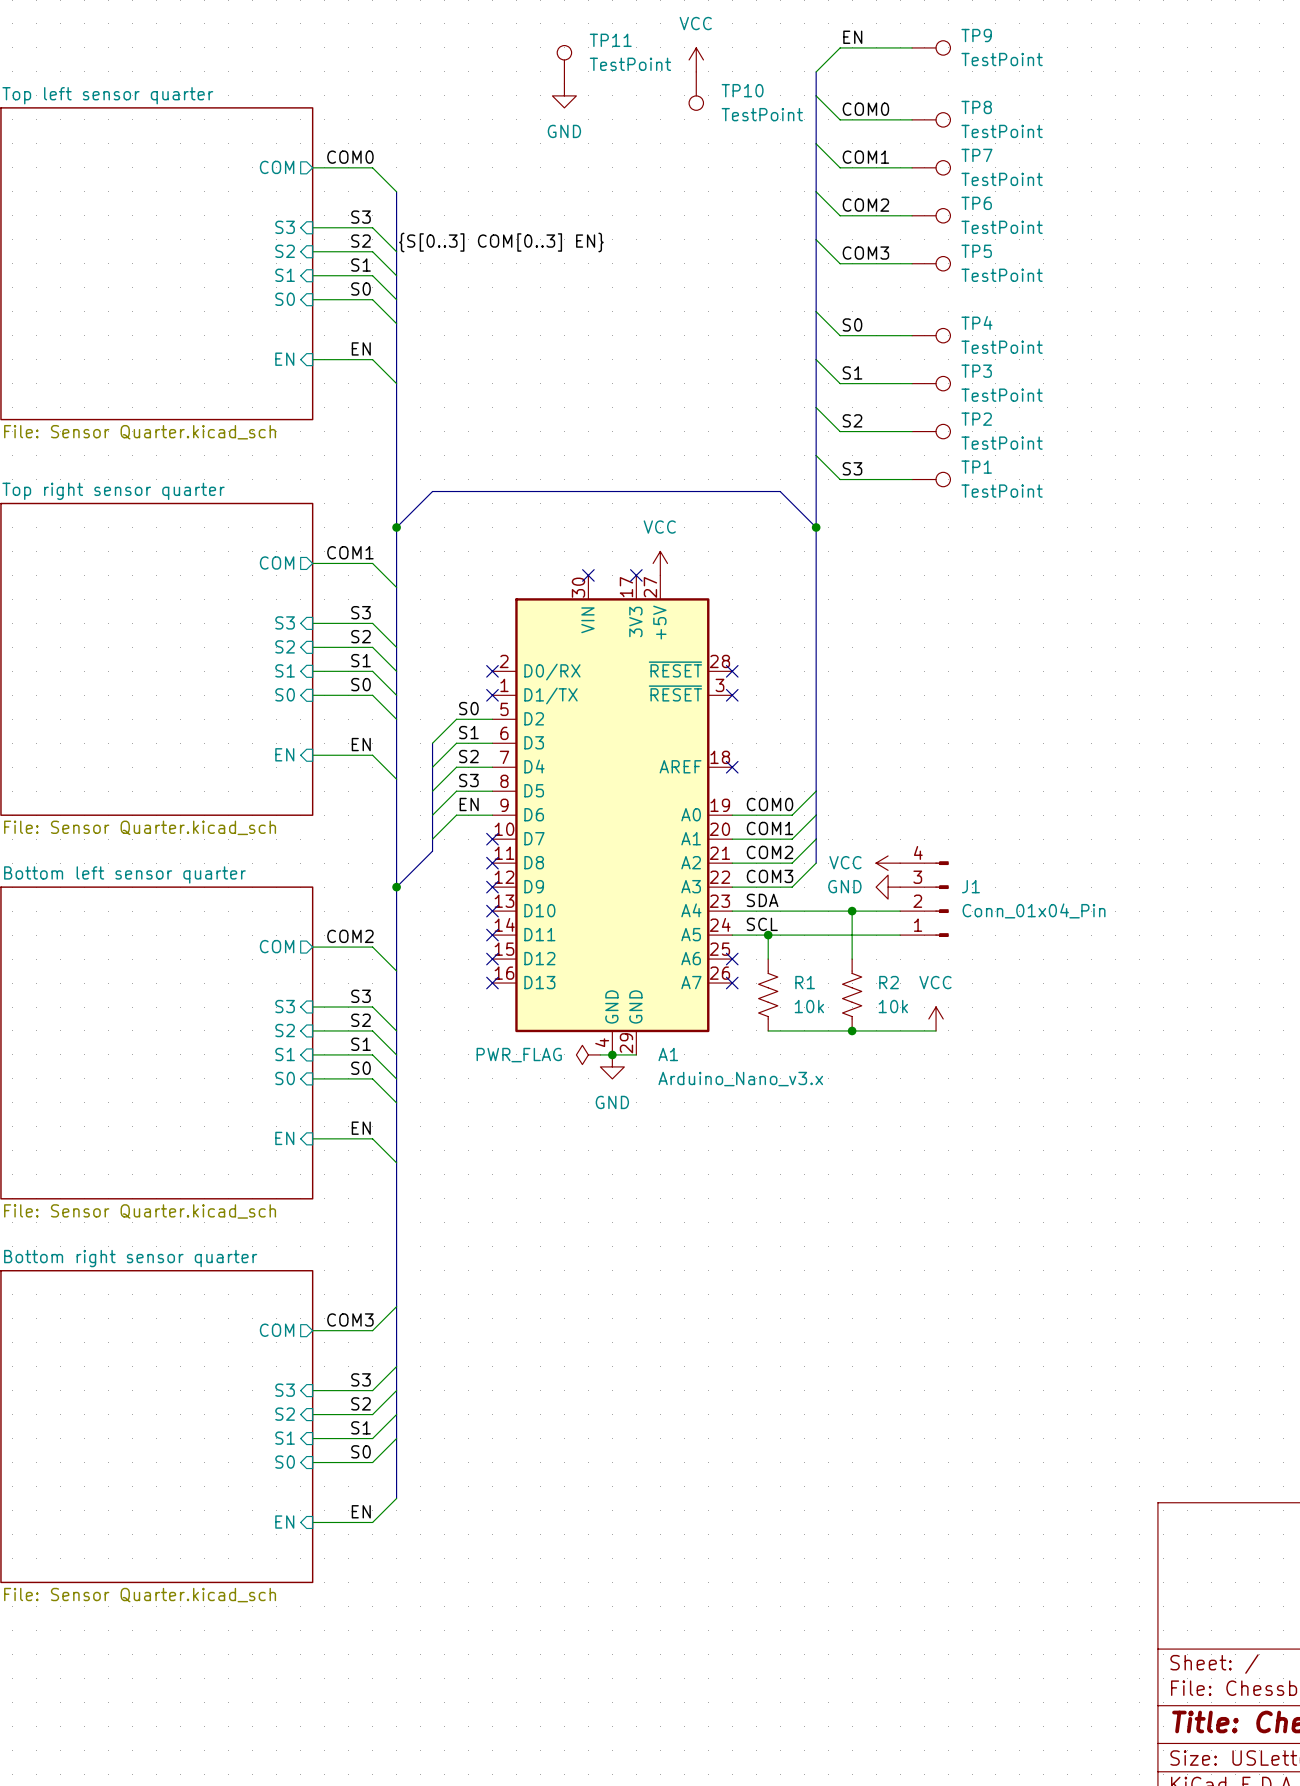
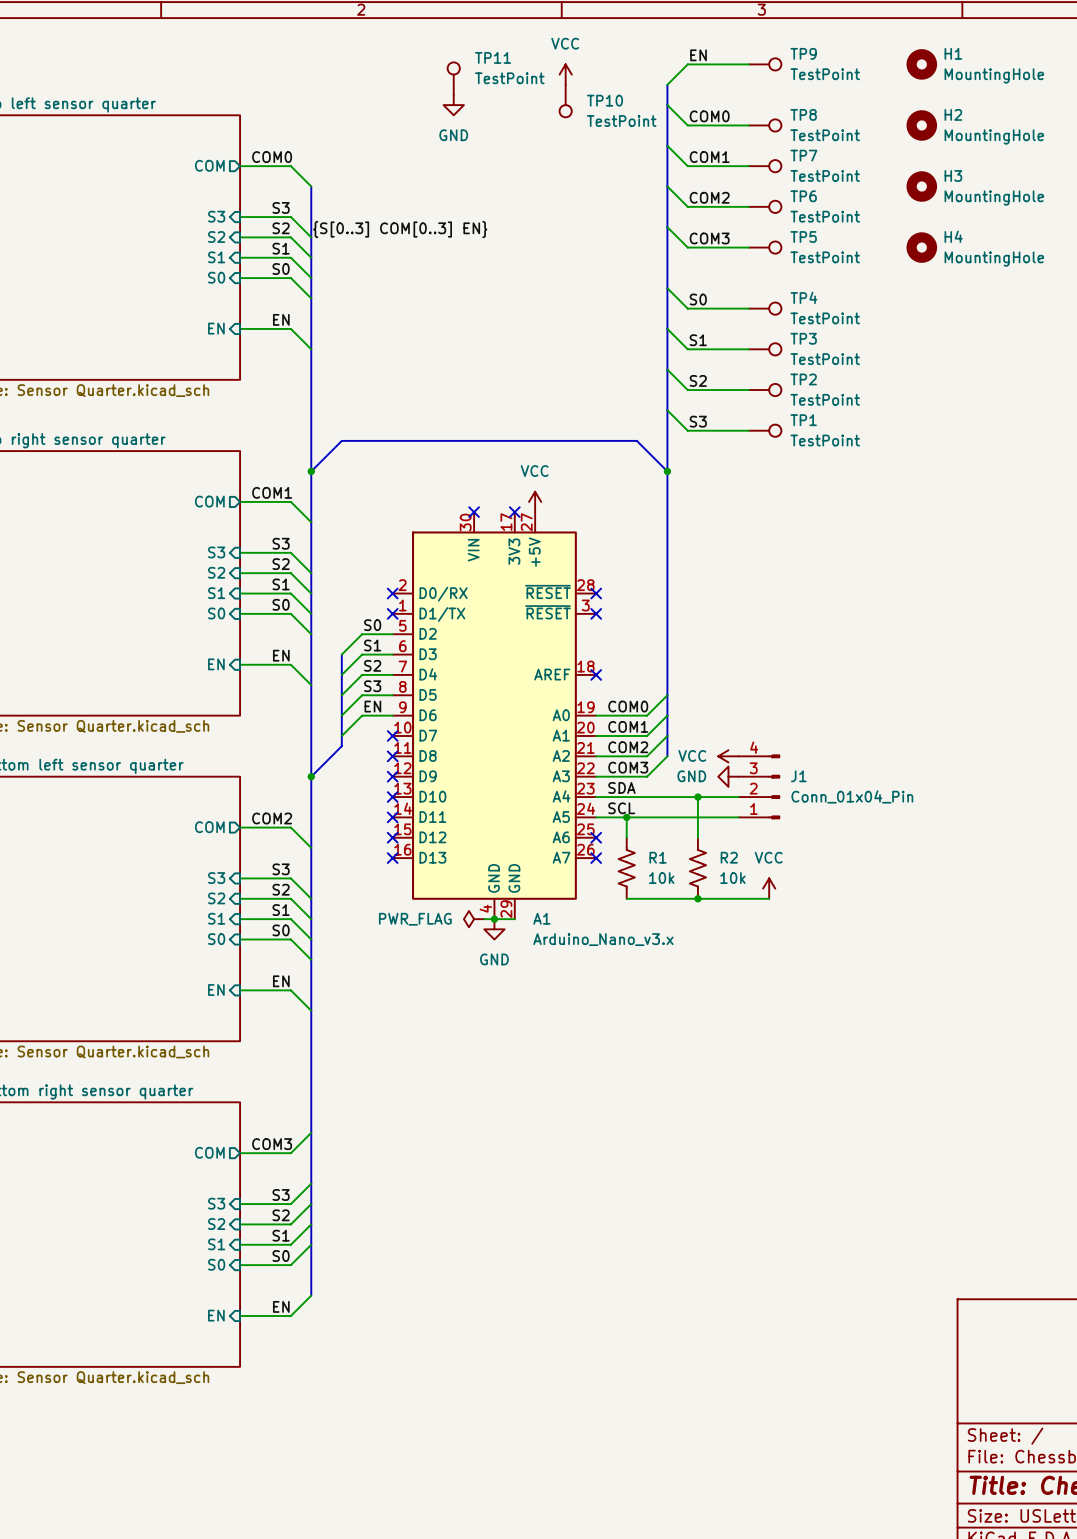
H1: none -> MountingHole (921, 64)
H2: none -> MountingHole (921, 125)
H3: none -> MountingHole (921, 186)
H4: none -> MountingHole (921, 247)

